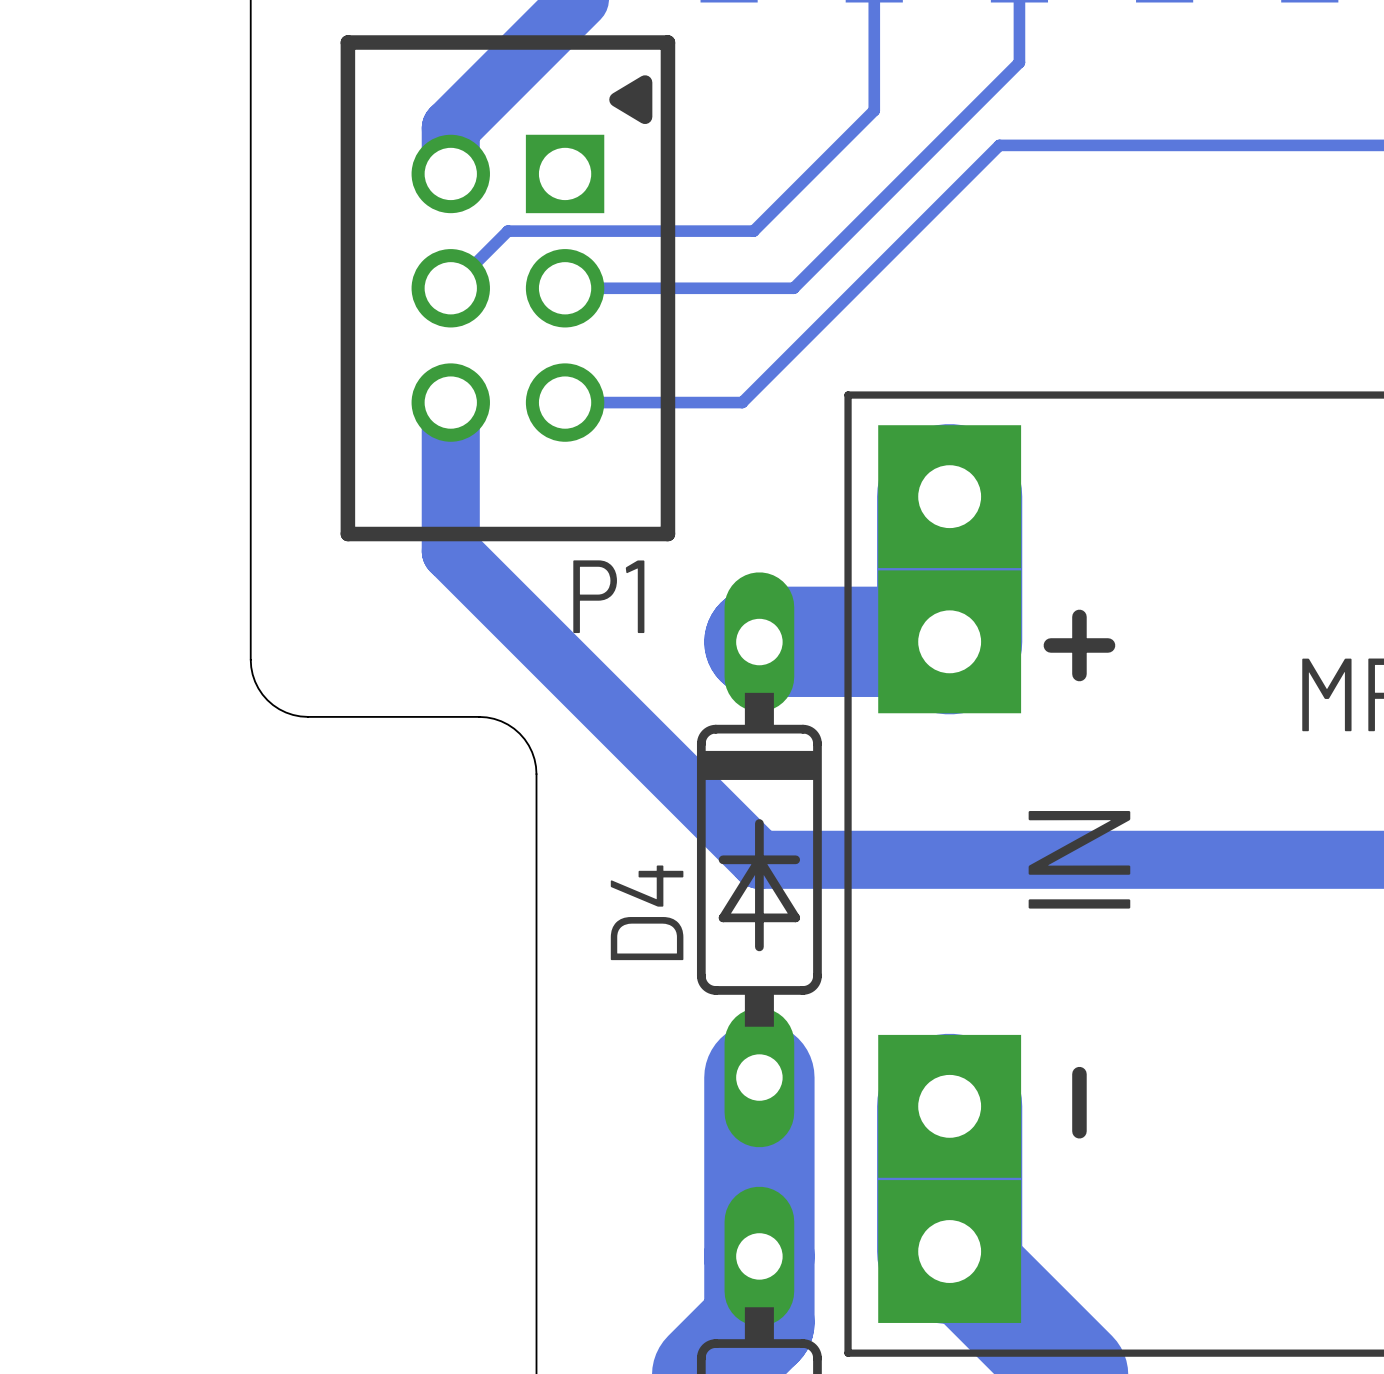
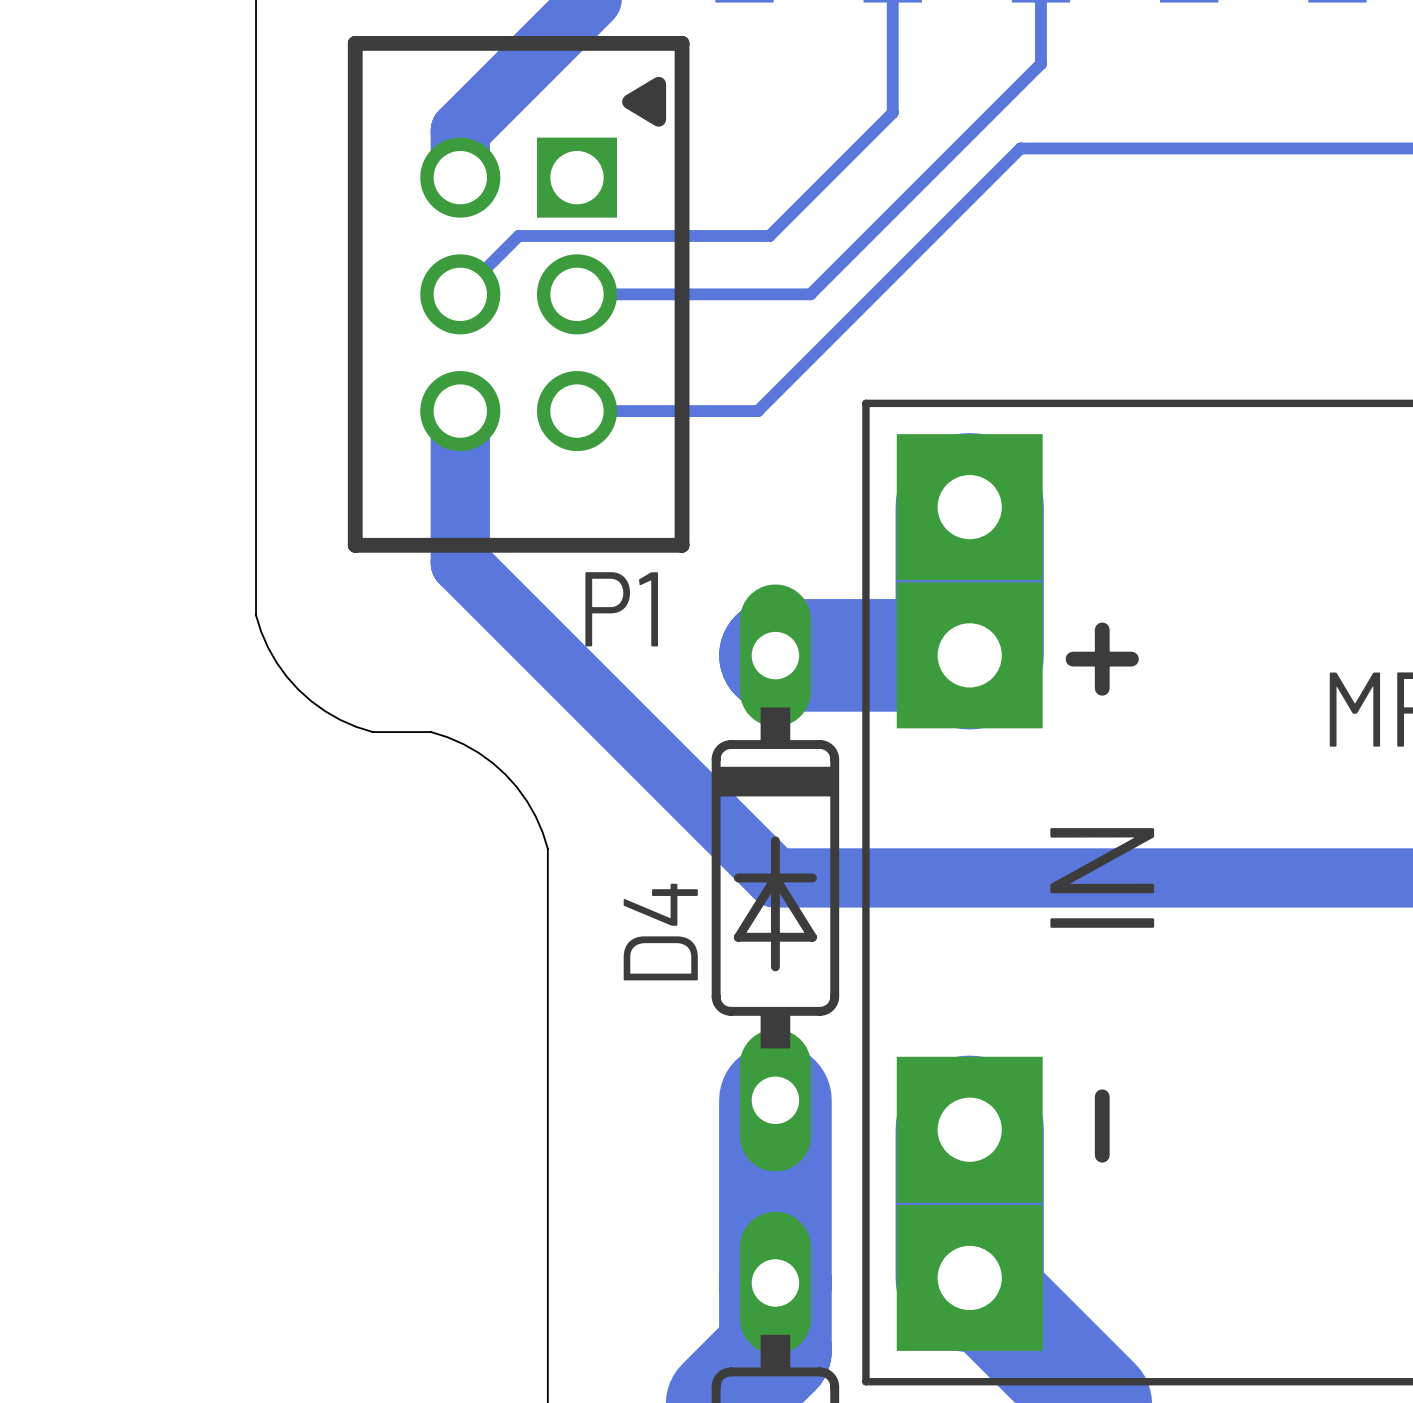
board edge: (250, 602) (251, 667) (255, 681) (267, 700) (286, 712) (300, 716) (365, 716) -> (256, 615) (268, 647) (286, 676) (298, 689) (311, 701) (340, 719) (372, 732)
board edge: (422, 716) (486, 717) (501, 721) (519, 733) (532, 752) (536, 766) (536, 831) -> (431, 732) (463, 744) (492, 762) (505, 774) (517, 787) (535, 816) (547, 848)

